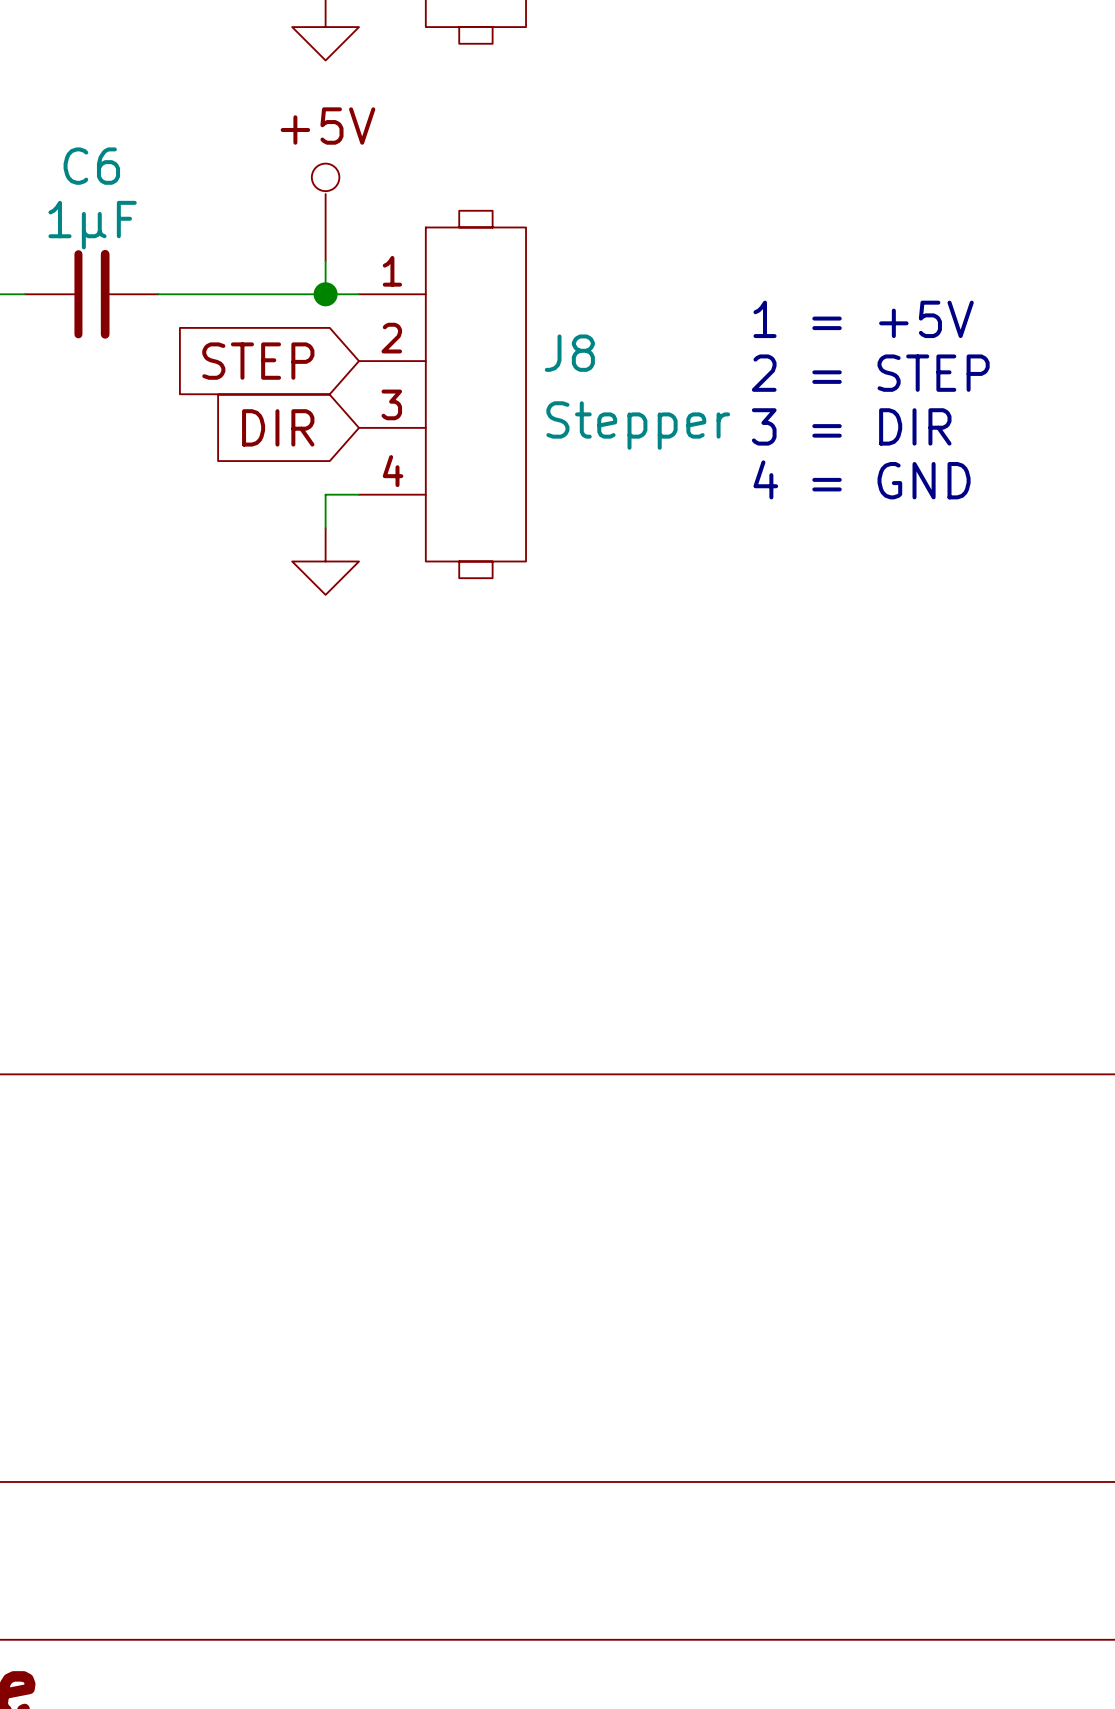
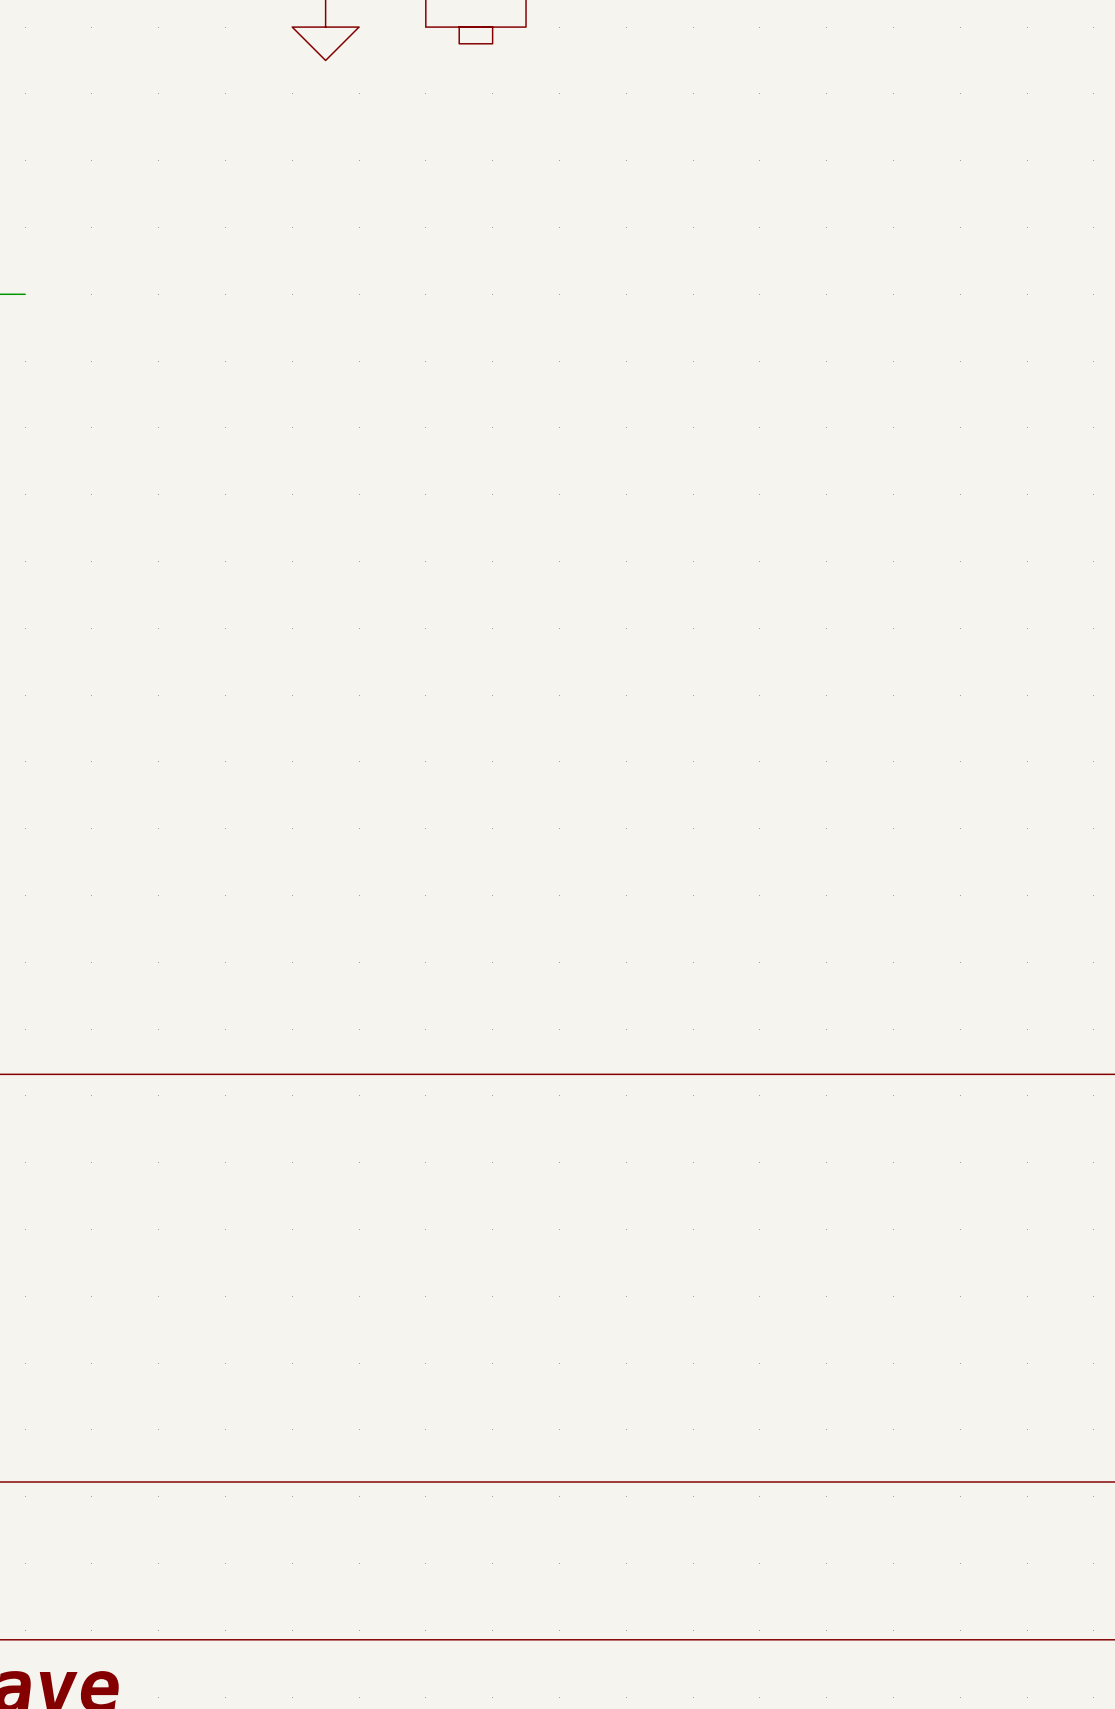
power symbol: (325, 212) -> none
wire: (325, 260) (325, 294) -> none
C6: 1µF (91, 294) -> none
wire: (158, 294) (359, 294) -> none
junction: (325, 294) -> none
text: 1 = +5V (863, 319) -> none
global label: STEP (258, 361) -> none
text: 2 = STEP (870, 373) -> none
J8: Stepper (442, 394) -> none
text: 3 = DIR (851, 426) -> none
global label: DIR (278, 427) -> none
text: 4 = GND (862, 479) -> none
wire: (359, 494) (325, 494) (325, 528) -> none
power symbol: (325, 561) -> none

